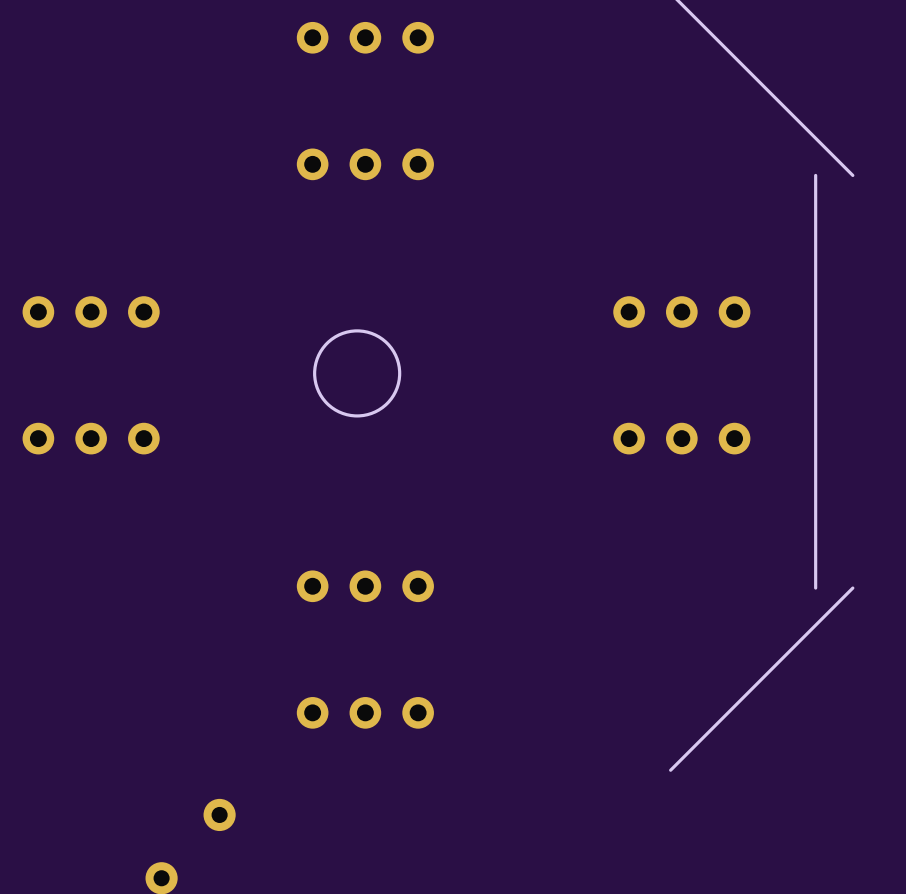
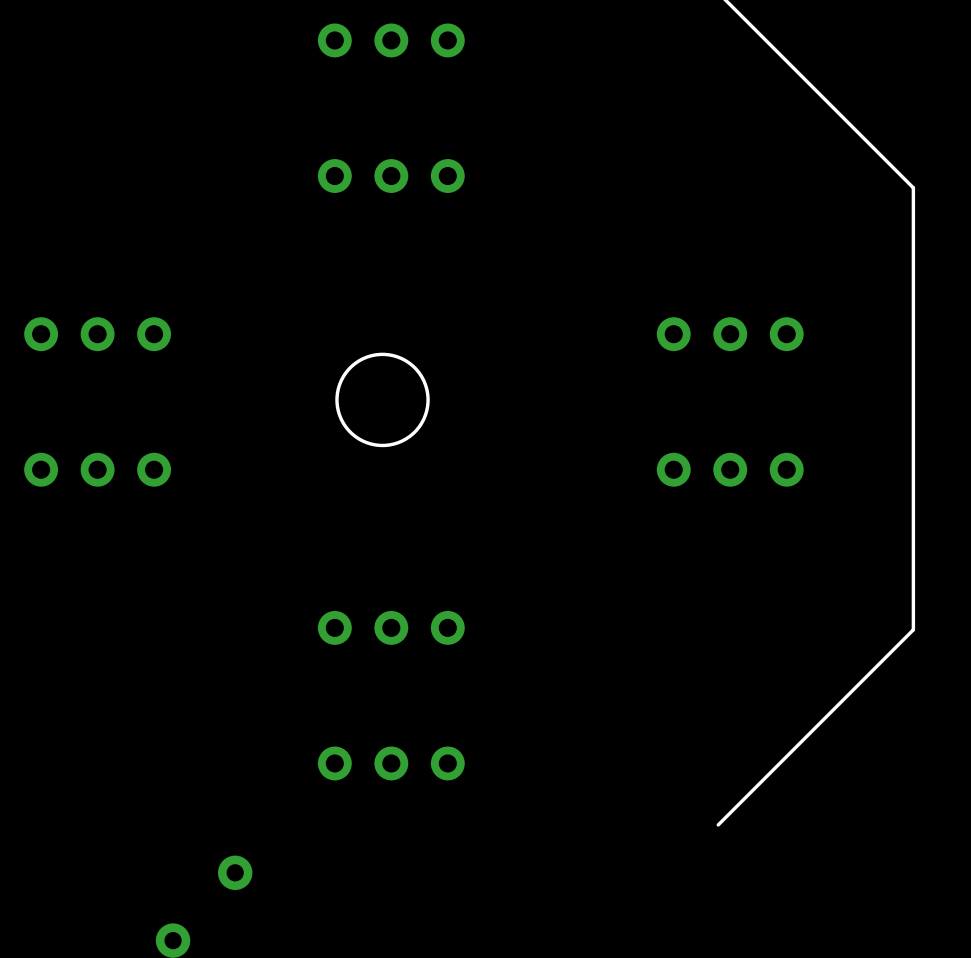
board edge: (815, 175) (815, 588) -> (913, 187) (913, 629)

